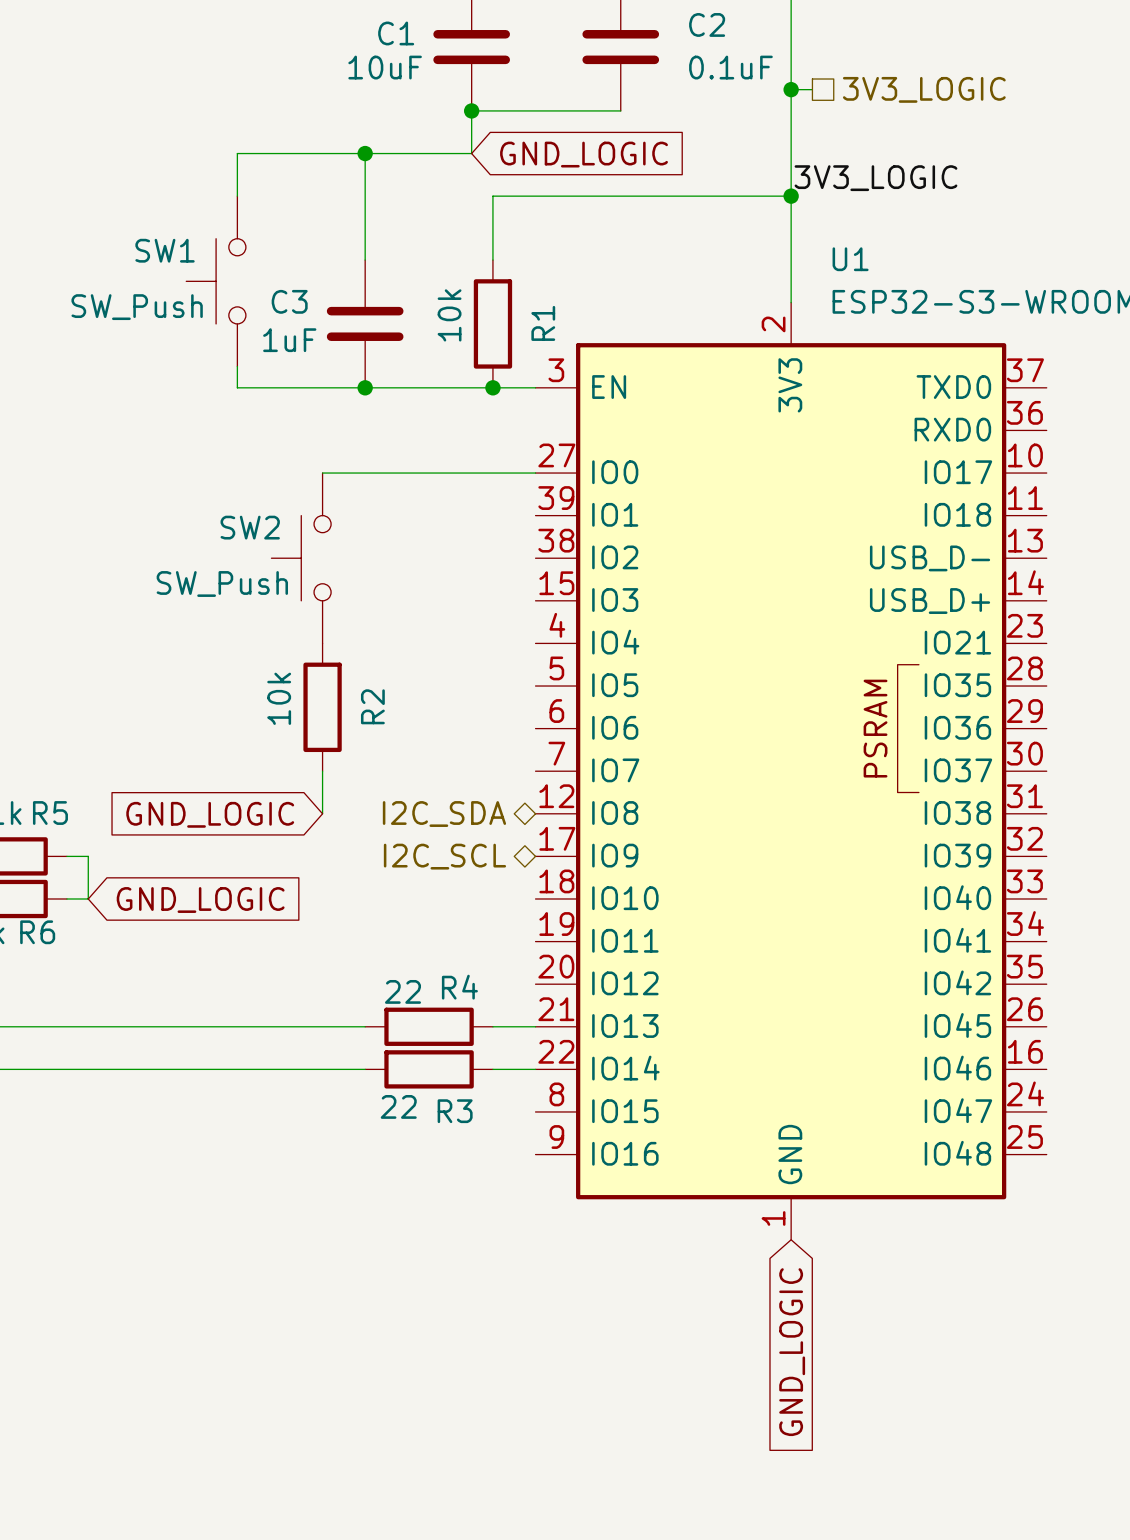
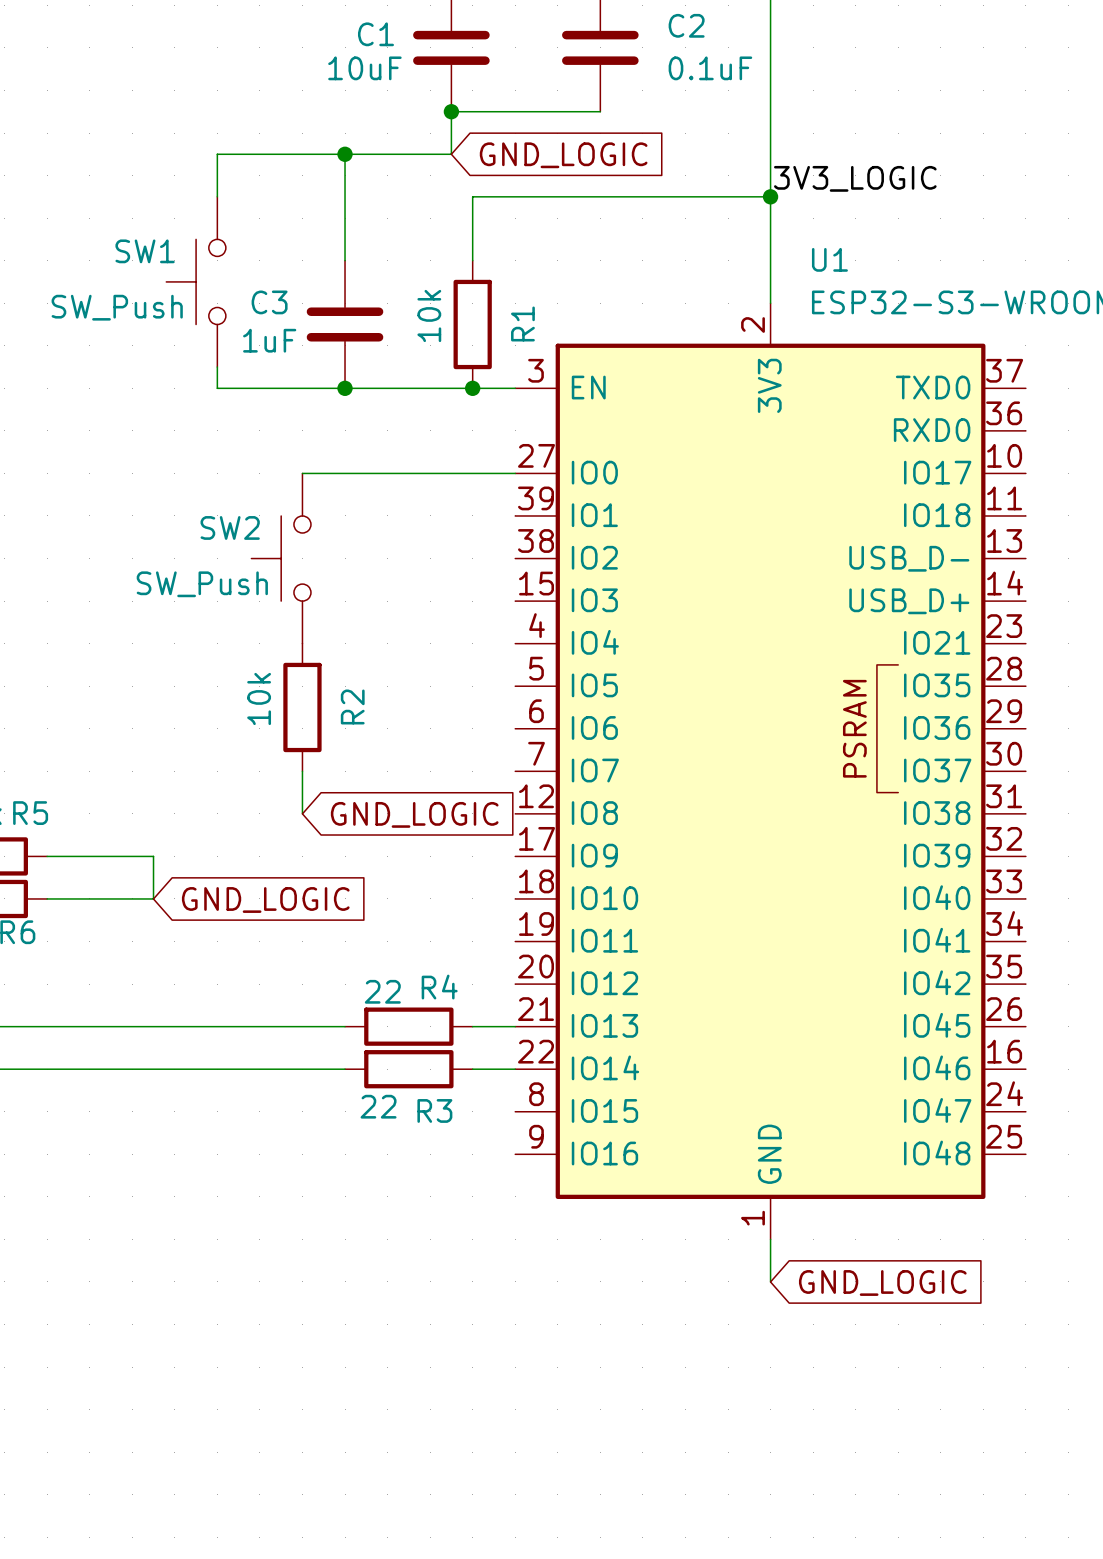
wire: (791, 89) (812, 89) -> none
junction: (791, 89) -> none
hierarchical label: 3V3_LOGIC (924, 89) -> none
global label rotation: 0° (210, 814) -> 180° (414, 814)
hierarchical label: I2C_SDA (444, 814) -> none
wire: (88, 856) (88, 898) -> (68, 856) (153, 856) (153, 898) (68, 898)
hierarchical label: I2C_SCL (444, 856) -> none
global label position: GND_LOGIC (200, 900) -> GND_LOGIC (265, 899)
wire: none -> (770, 1239) (770, 1281)
global label rotation: 0° (792, 1352) -> 90° counterclockwise (882, 1282)

